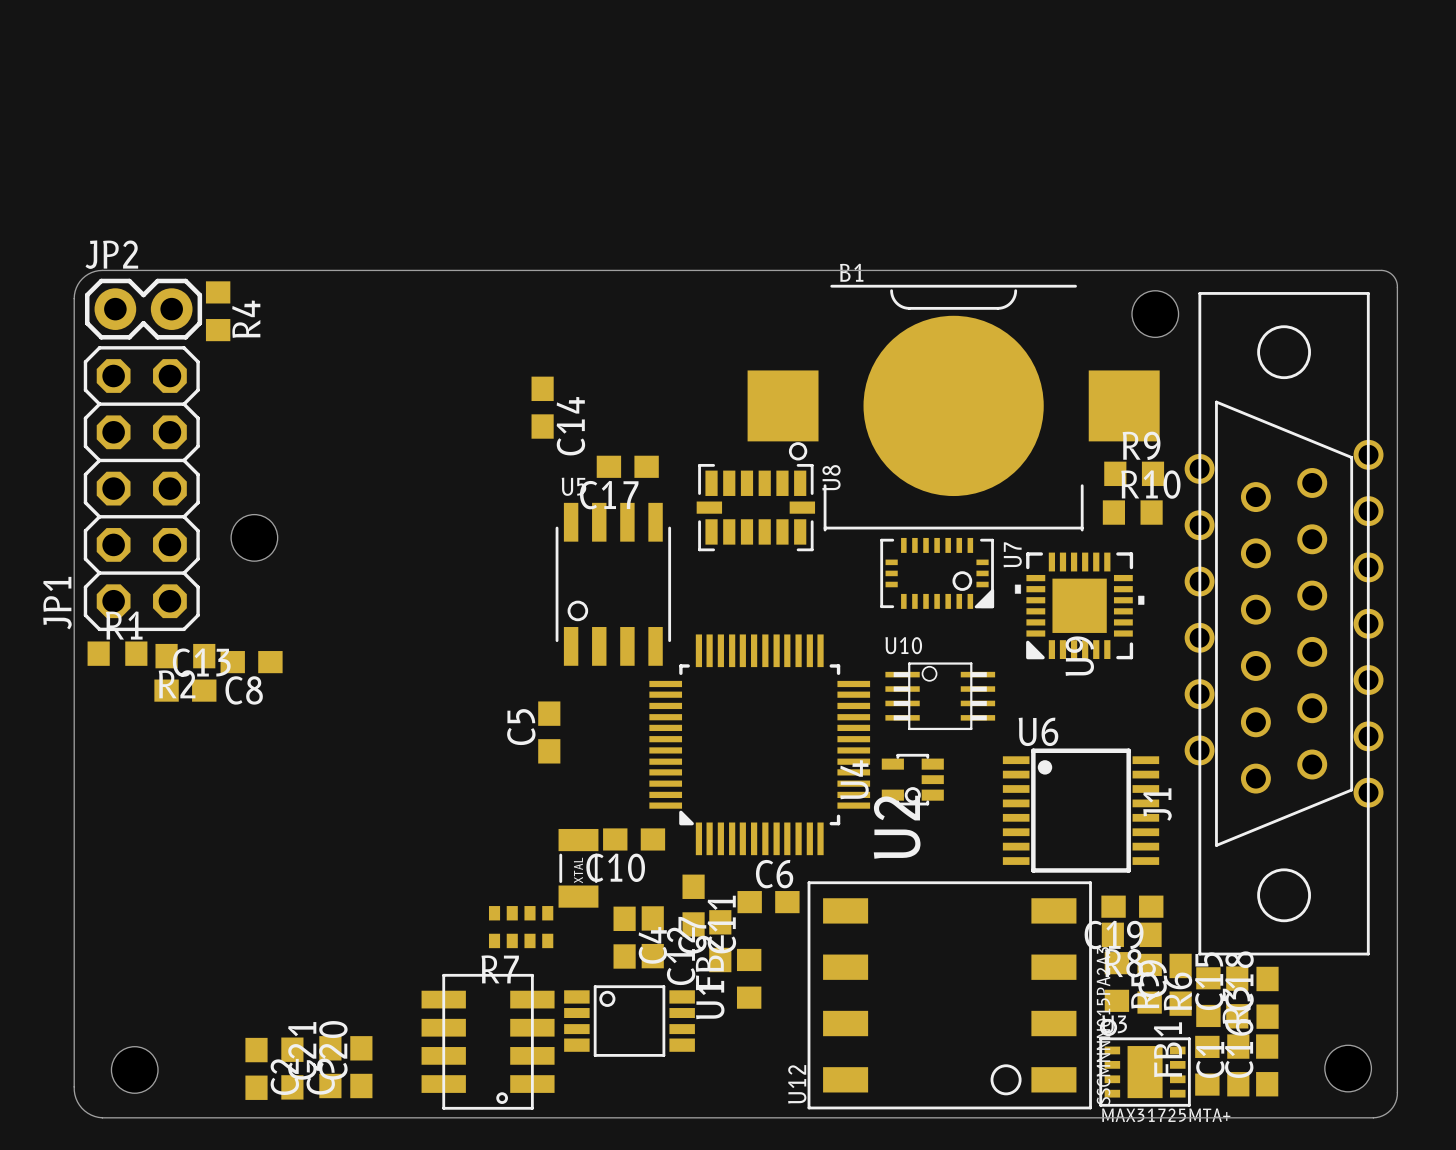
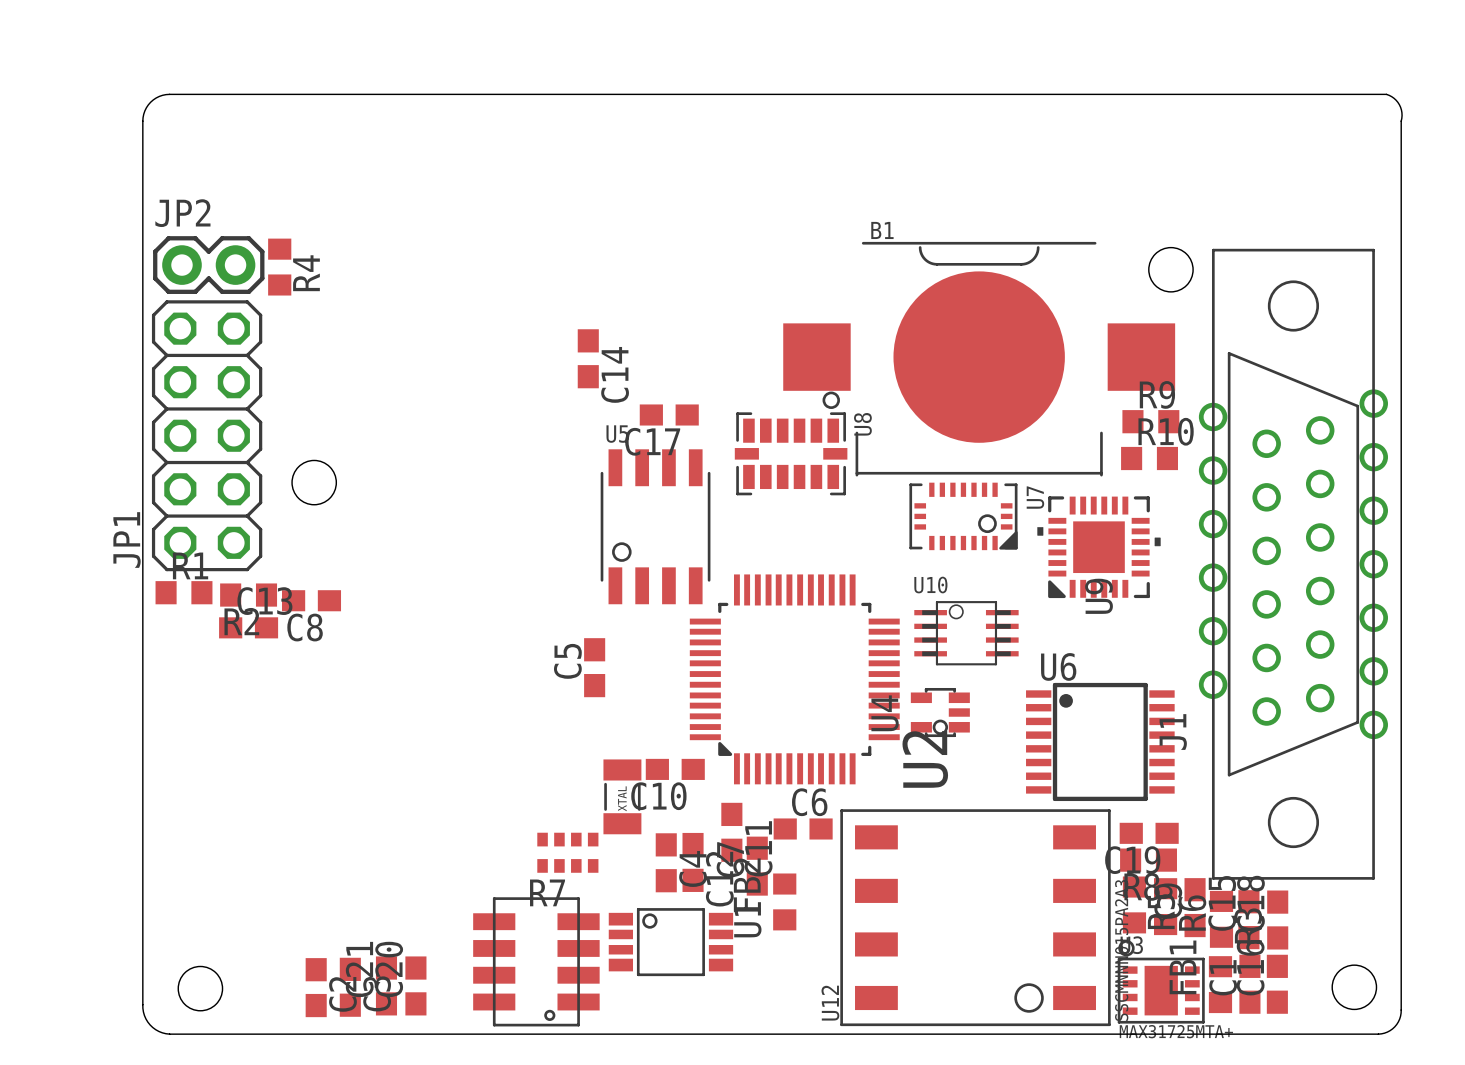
board edge: (1397, 287) (1393, 275) (1381, 270) (102, 270) (91, 272) (82, 278) (76, 287) (74, 298) -> (1401, 244) (1401, 112) (1397, 102) (1386, 94) (169, 94) (153, 99) (146, 107) (143, 117) (142, 255)

